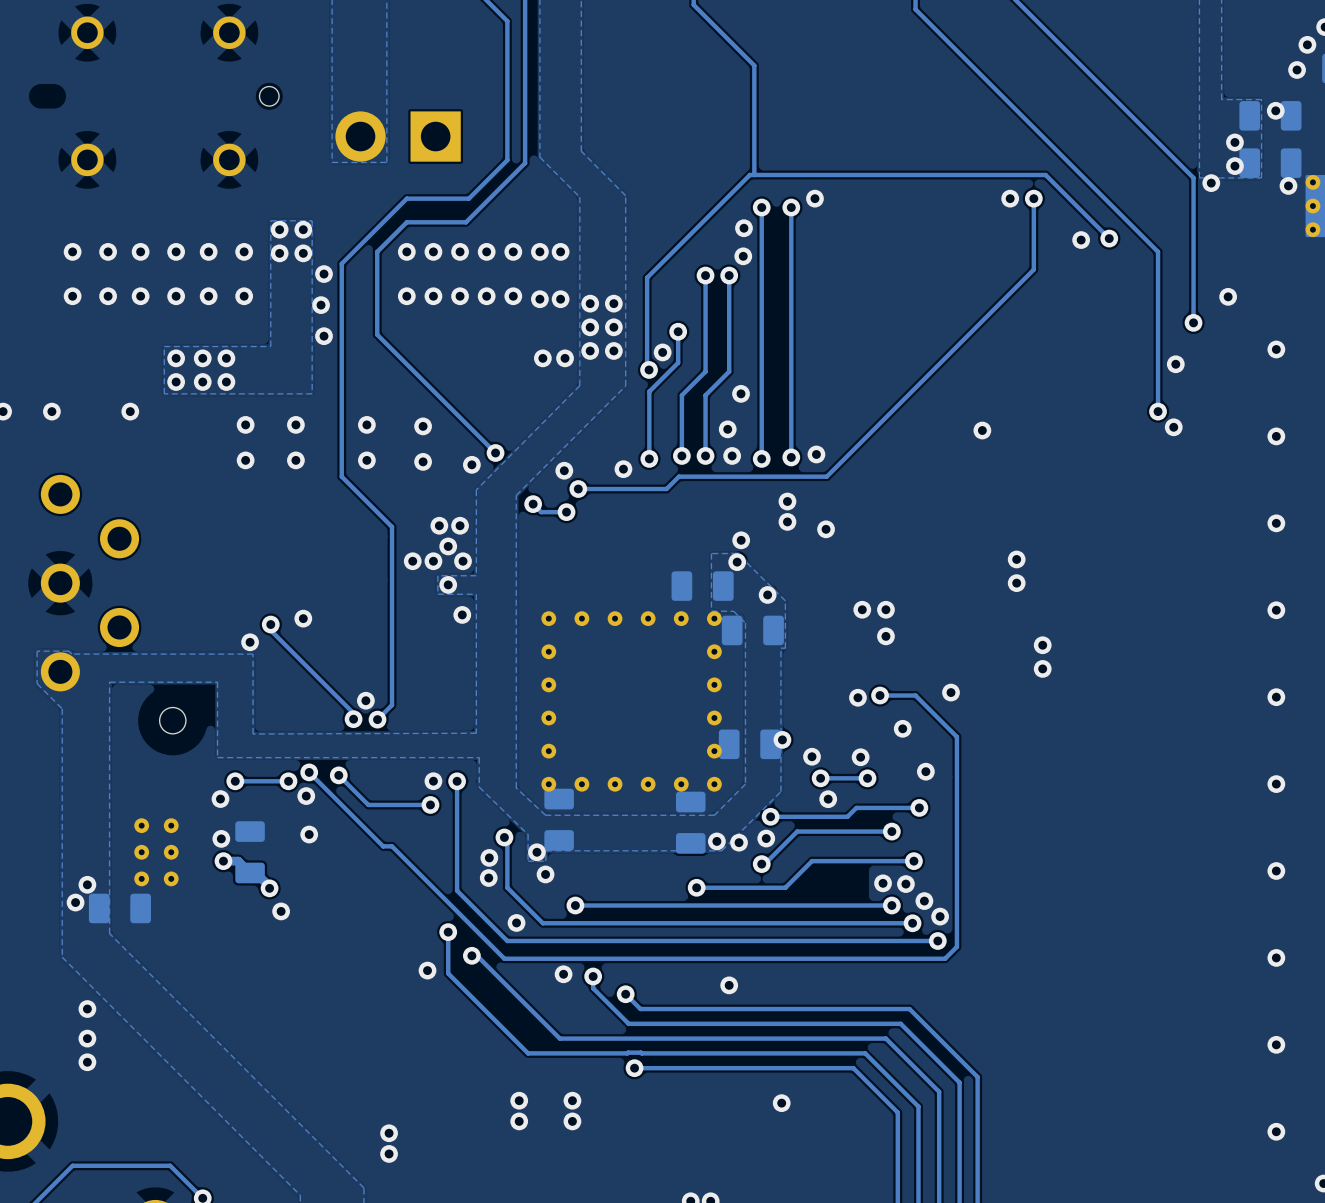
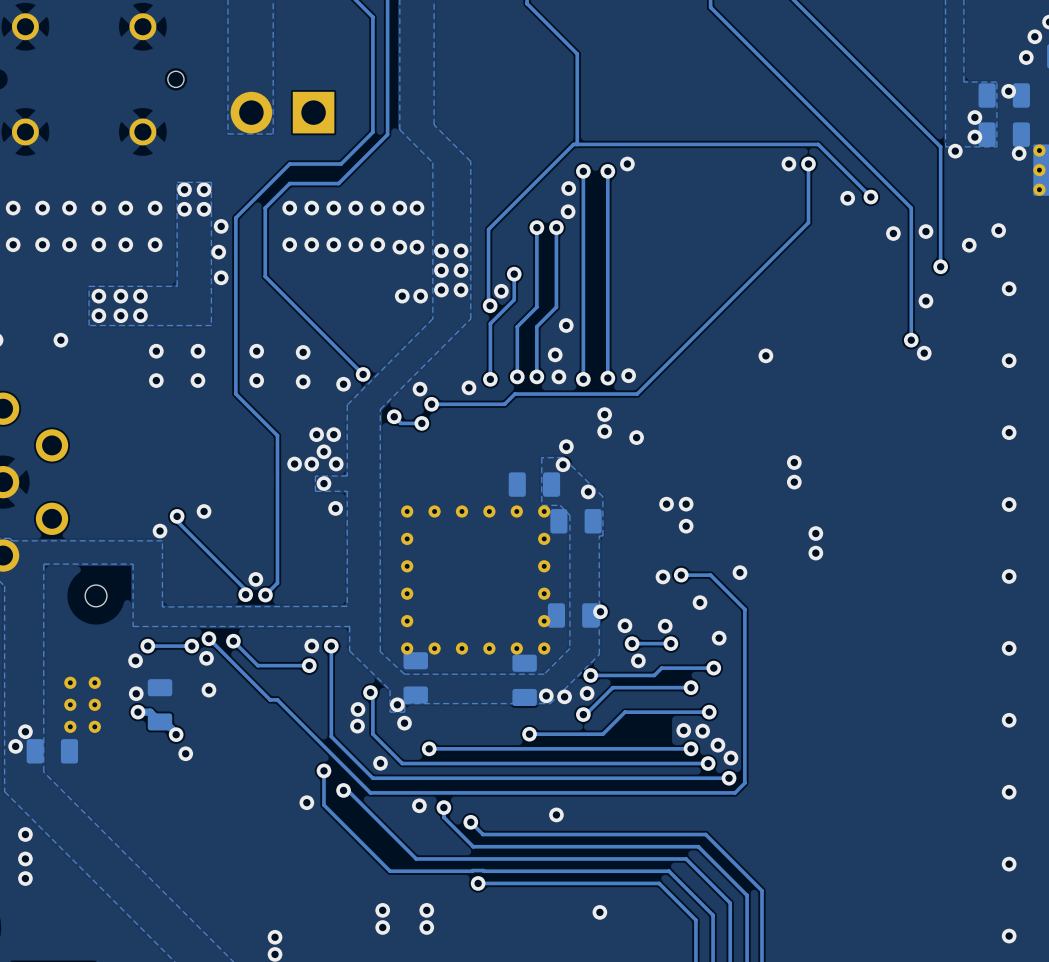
via: none -> (998, 230)
via: none -> (925, 231)
via: none -> (893, 233)

